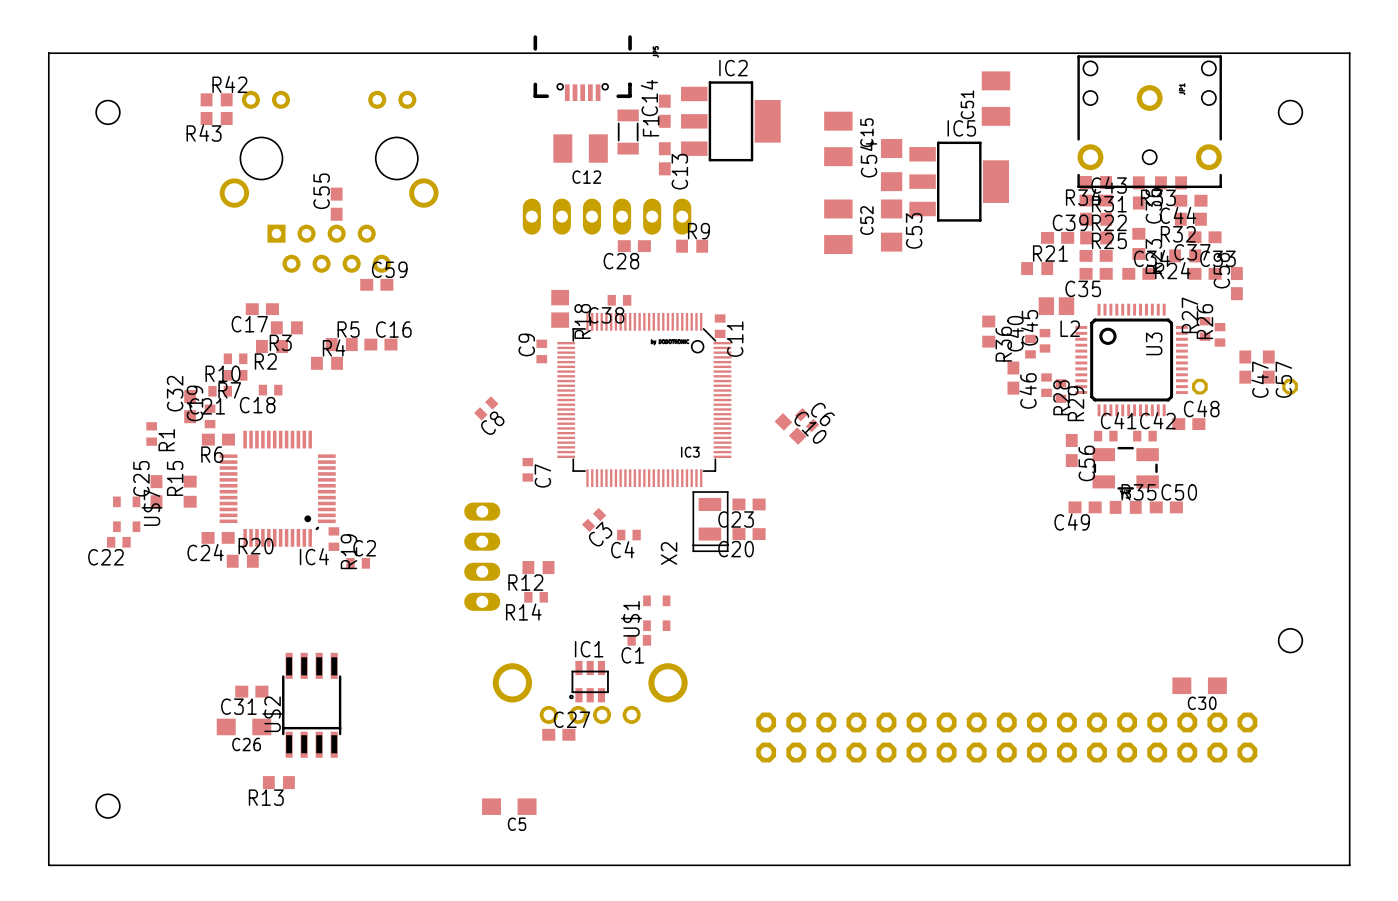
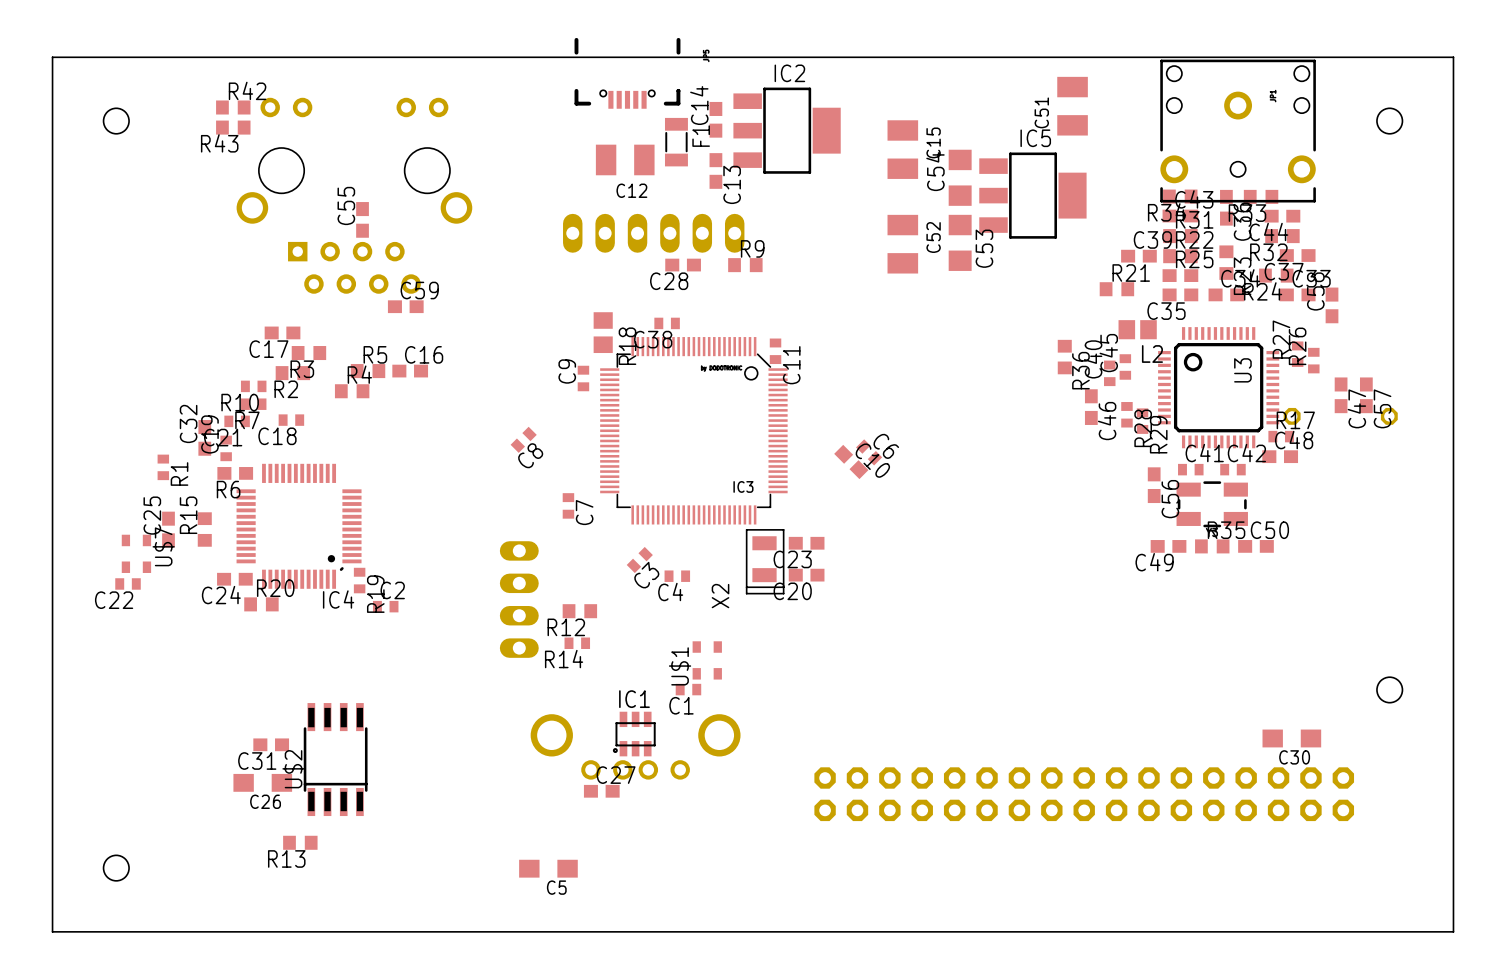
R17: none -> (1281, 436)

